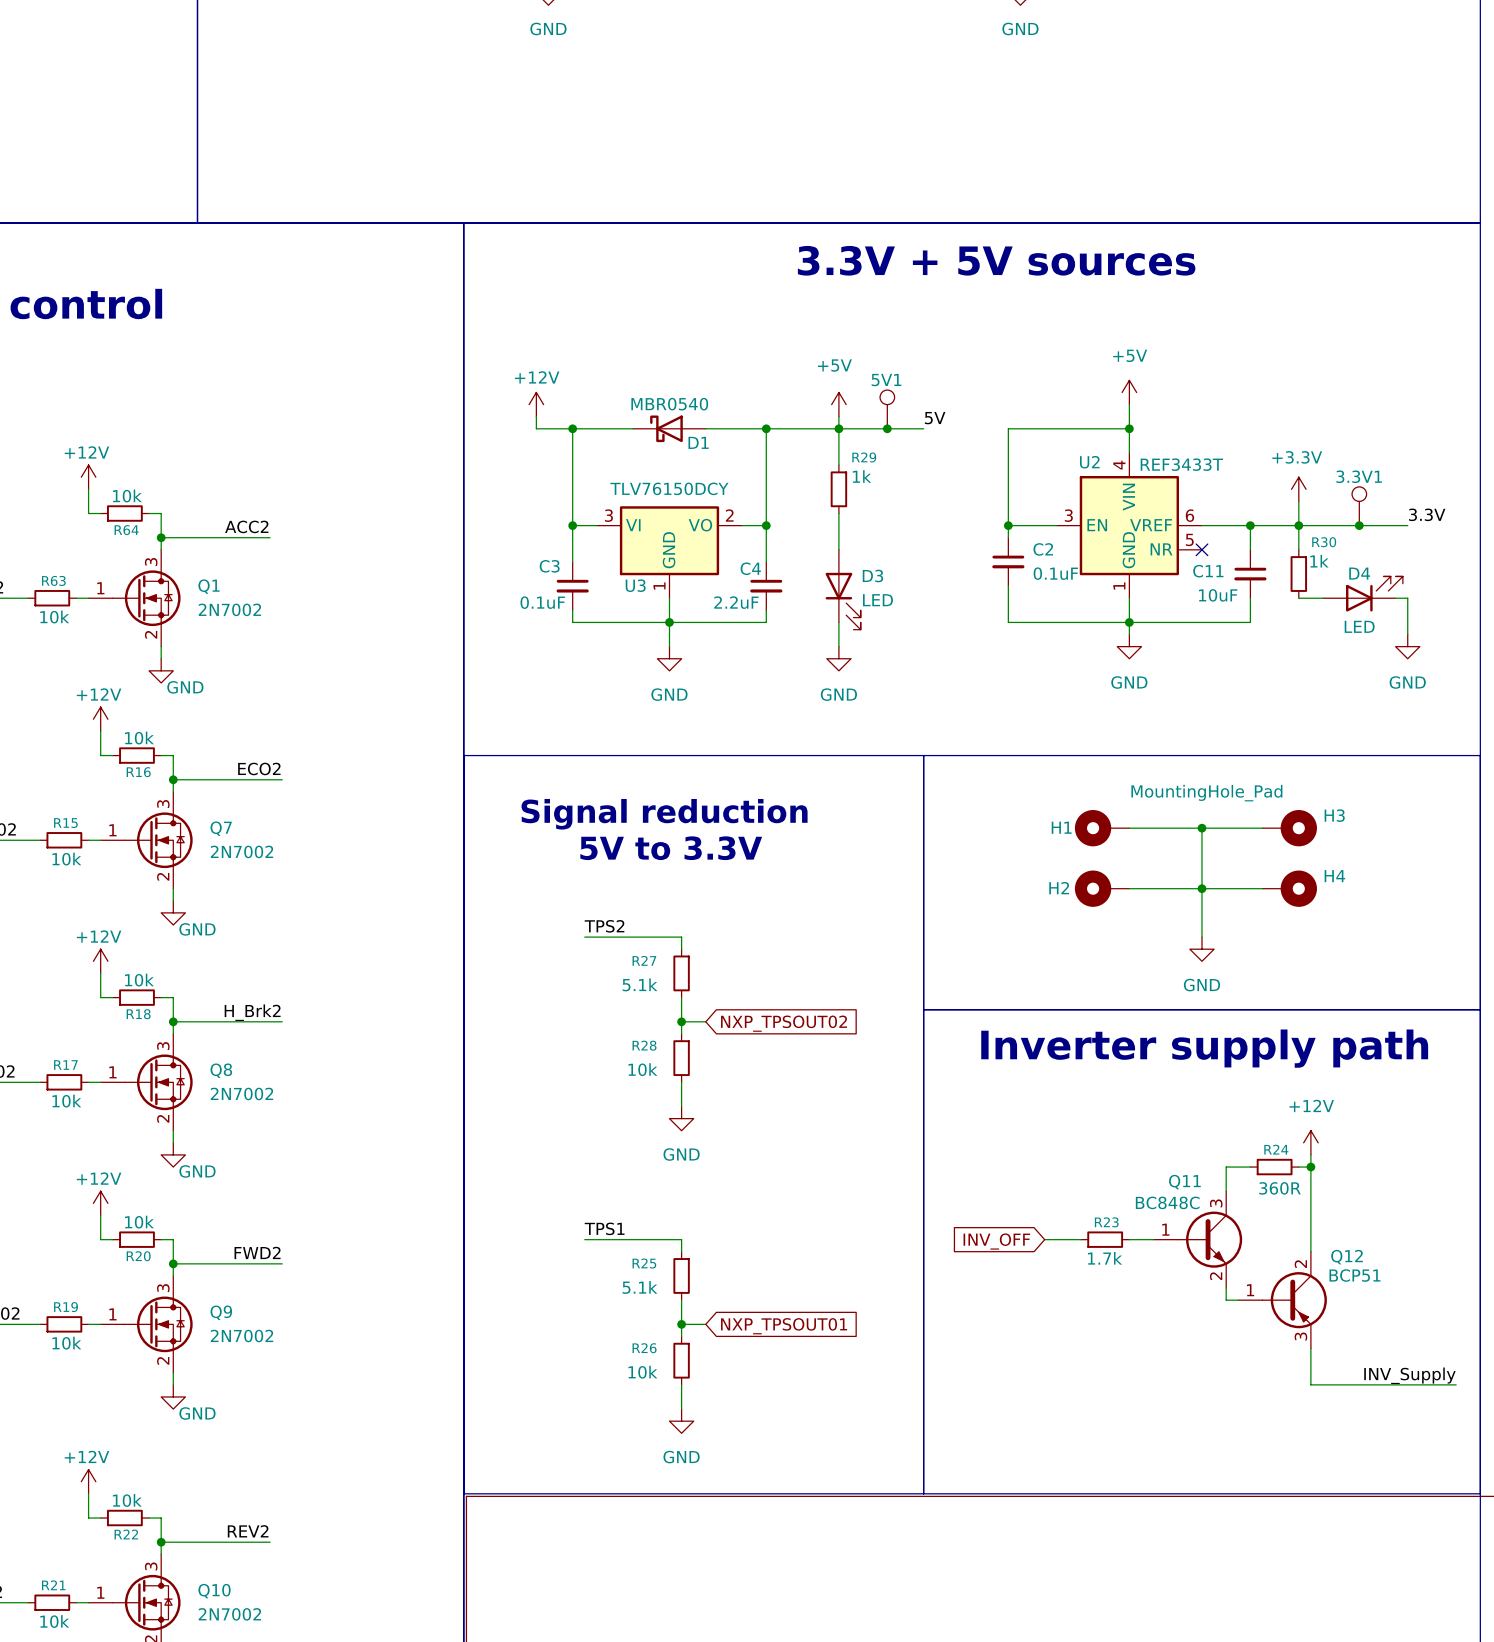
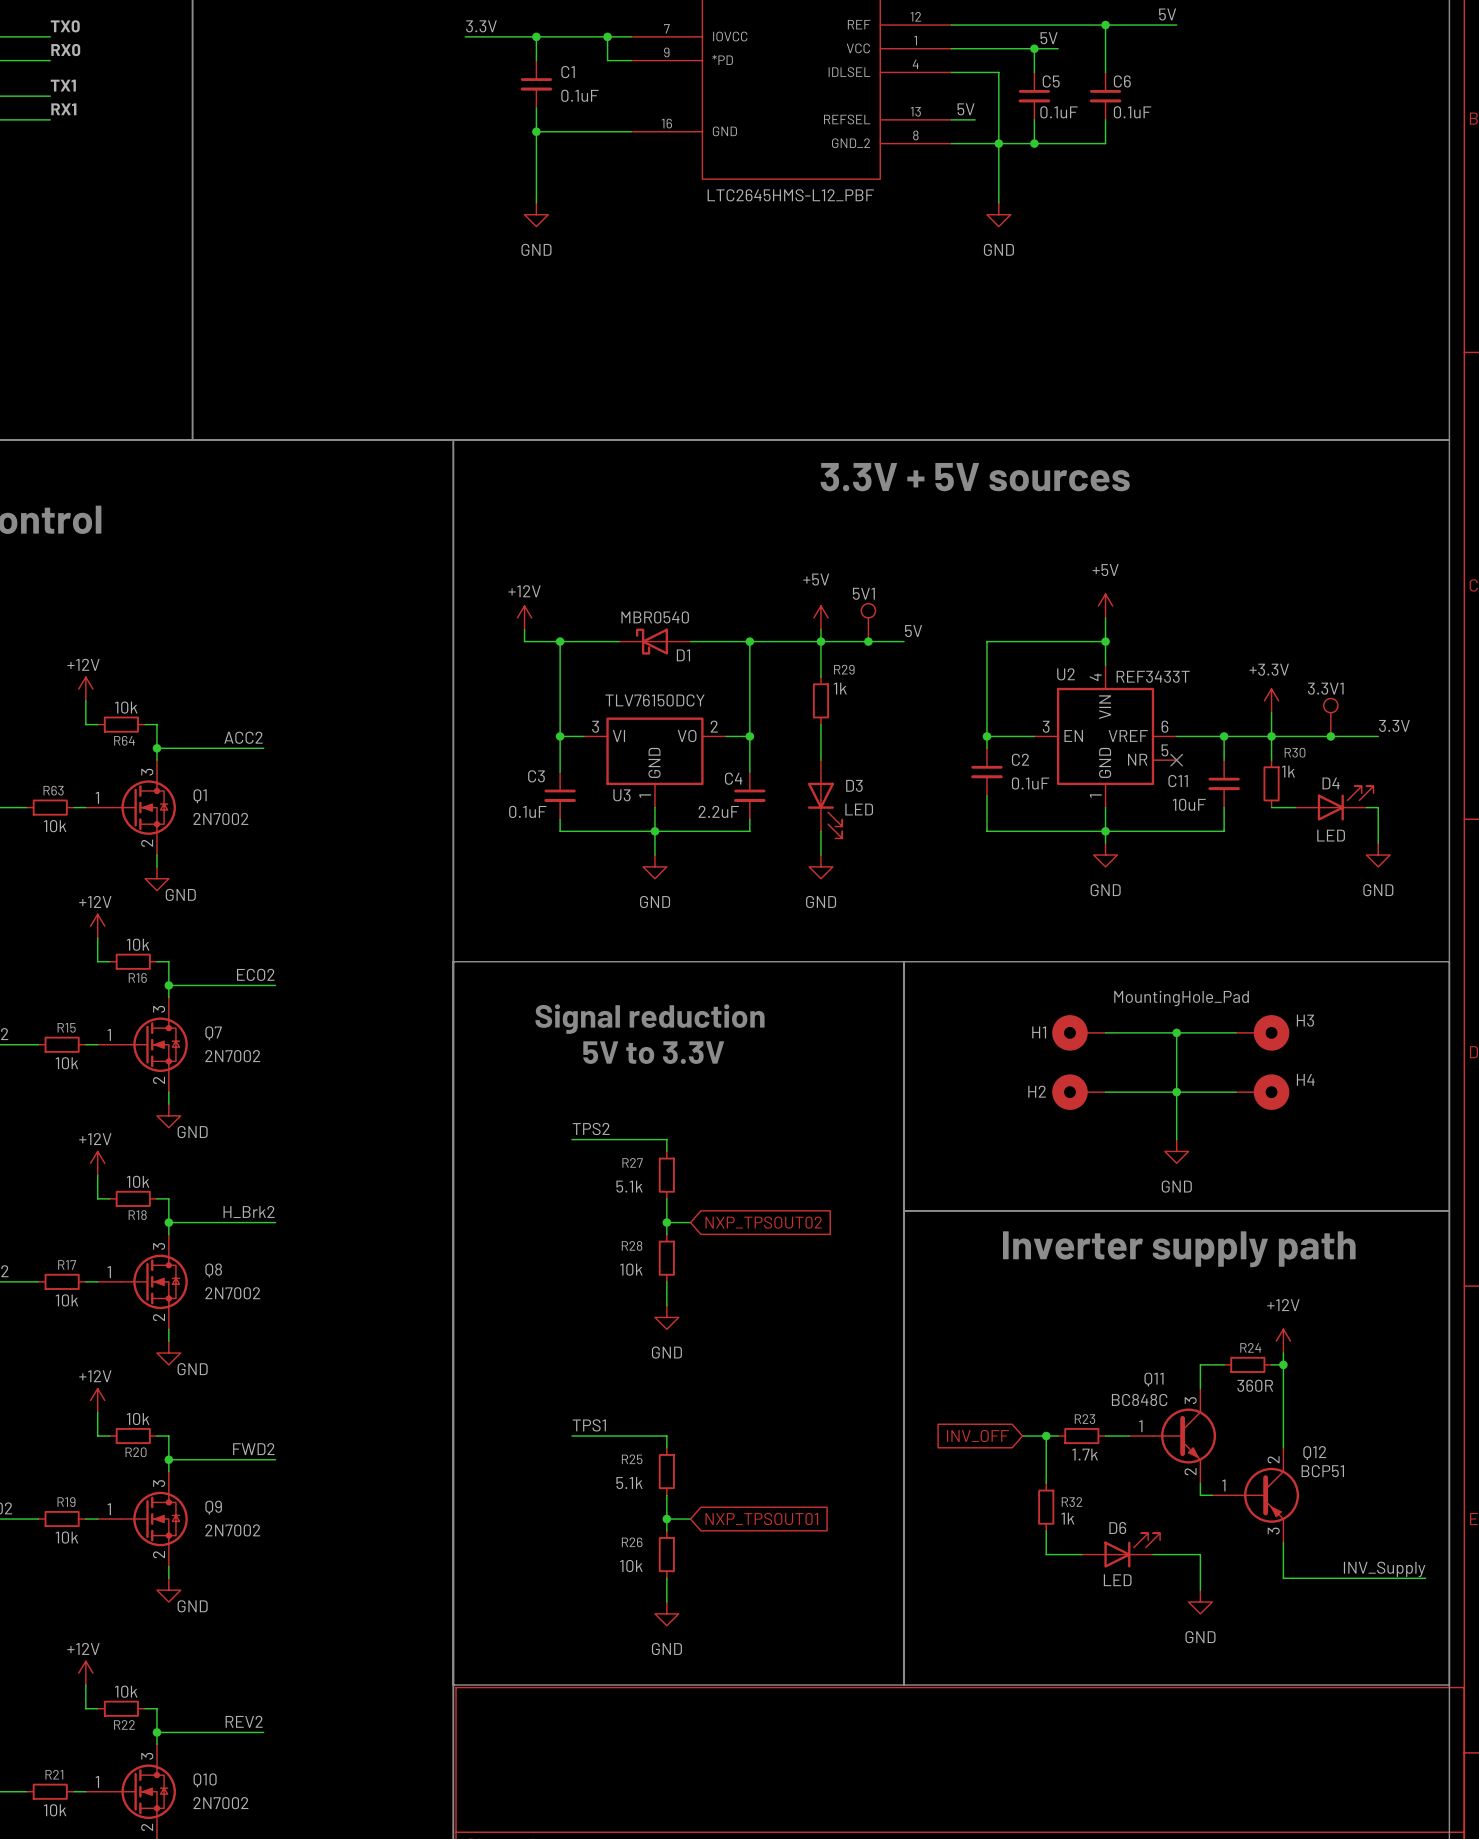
wire: none -> (1046, 1436) (1046, 1483)
junction: none -> (1046, 1436)
R32: none -> 1k (1046, 1507)
wire: none -> (1046, 1530) (1046, 1554) (1081, 1554)
D6: none -> LED (1120, 1550)
wire: none -> (1152, 1554) (1200, 1554) (1200, 1590)
power symbol: none -> GND (1200, 1602)

